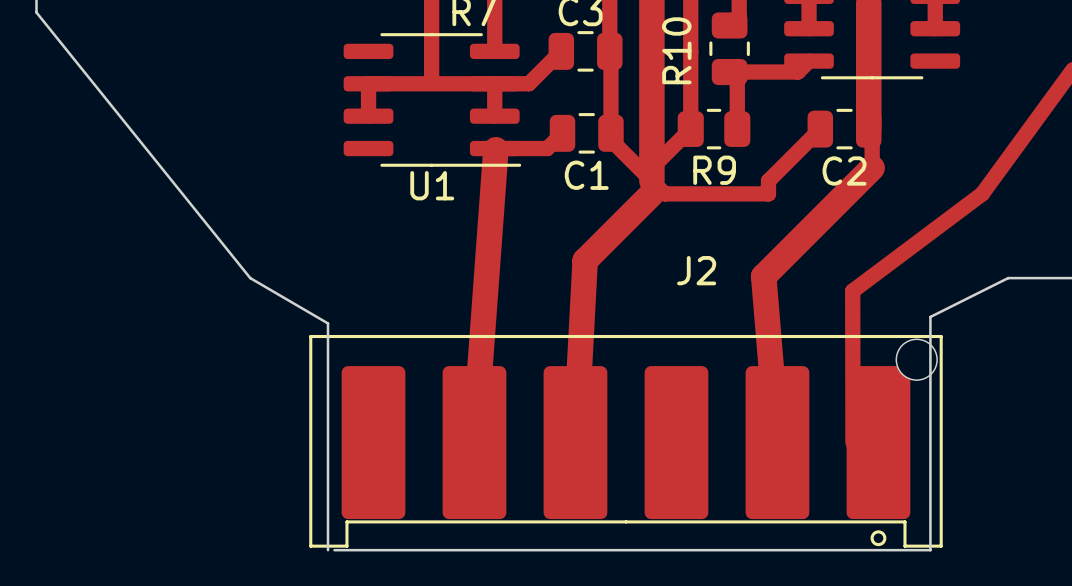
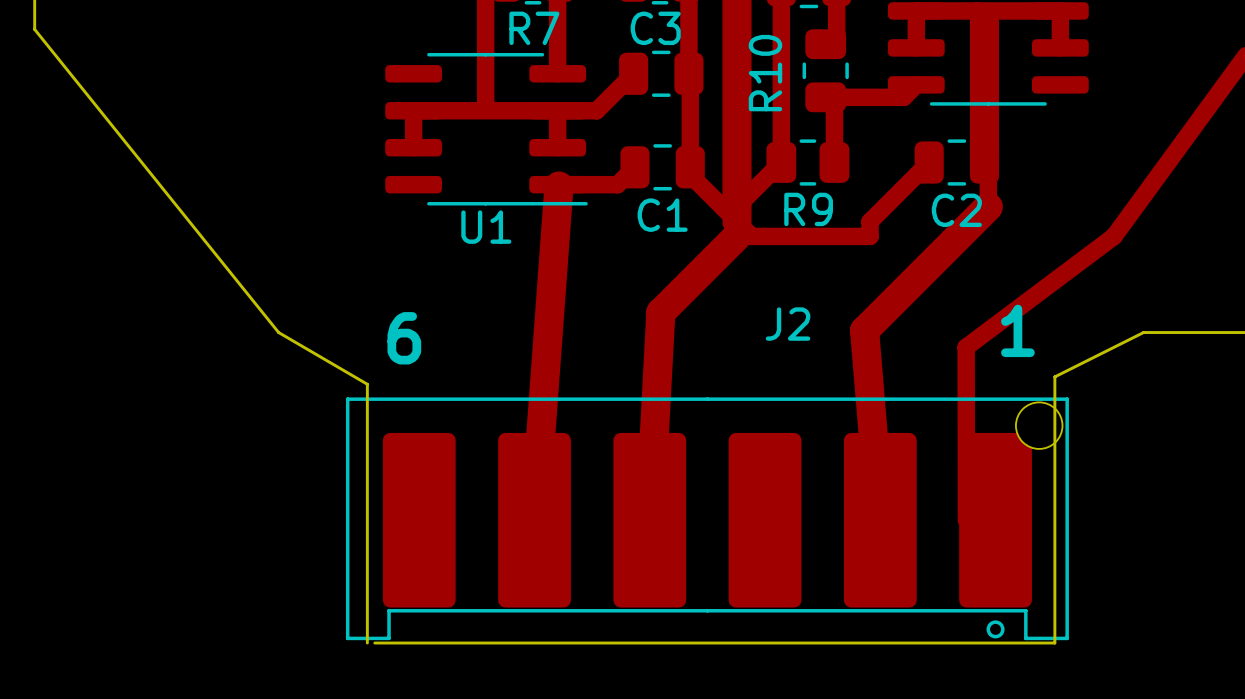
text: none -> 1 (1017, 330)
text: none -> 6 (404, 338)

